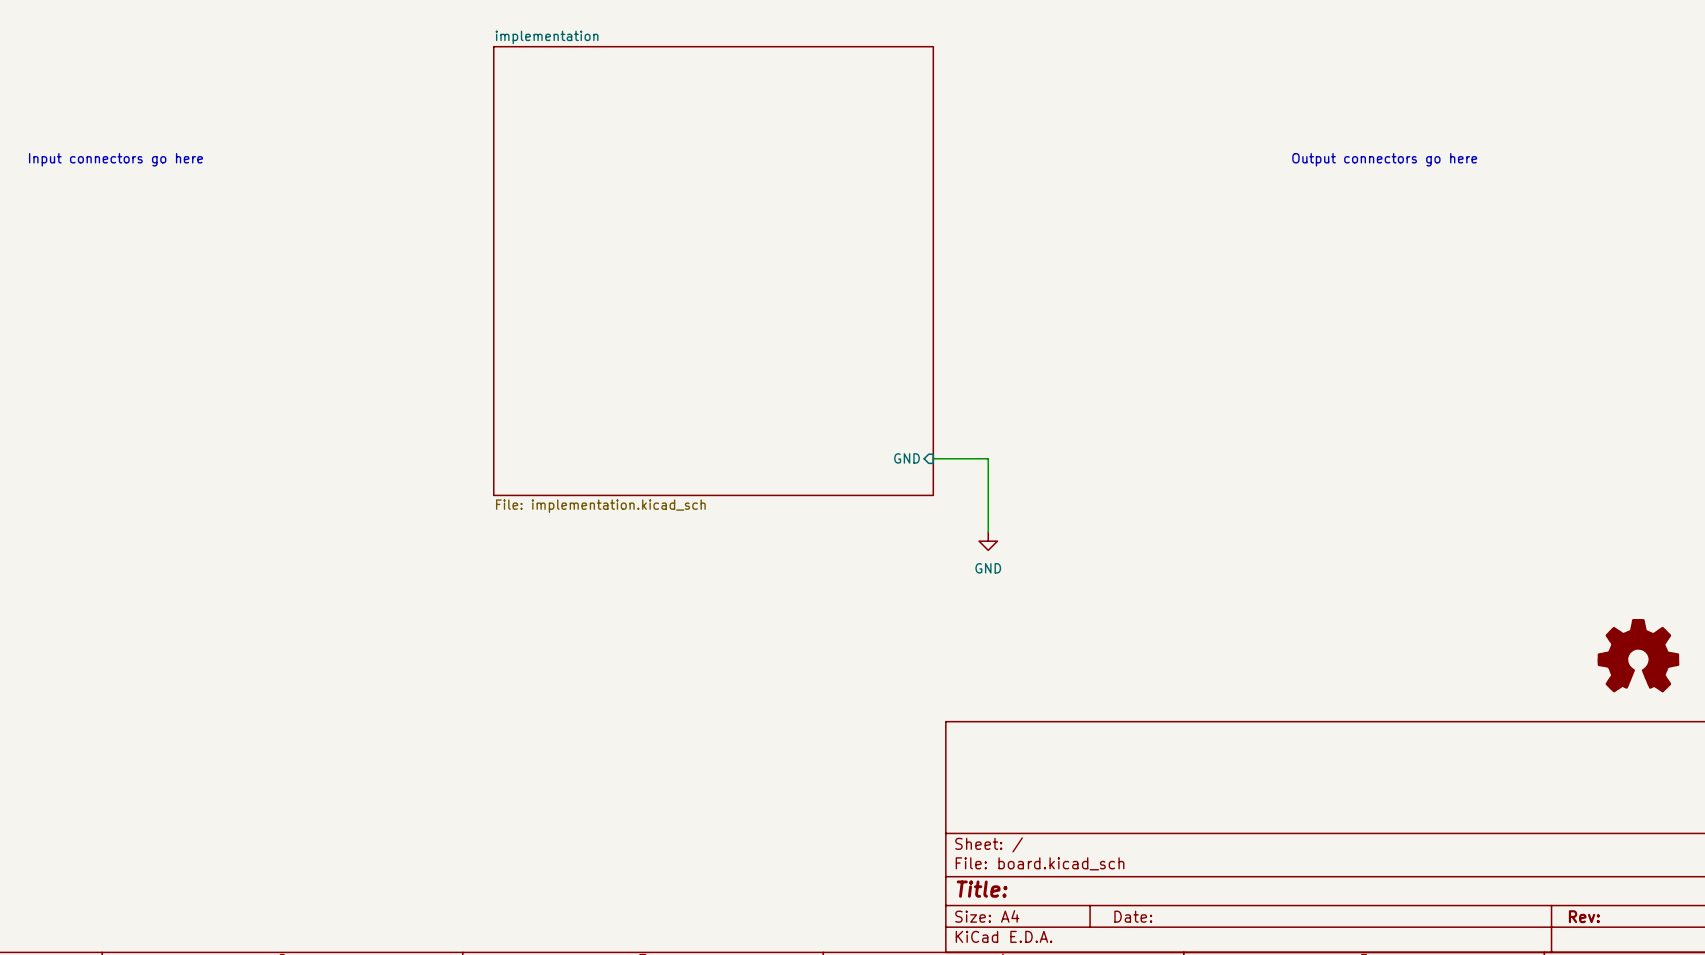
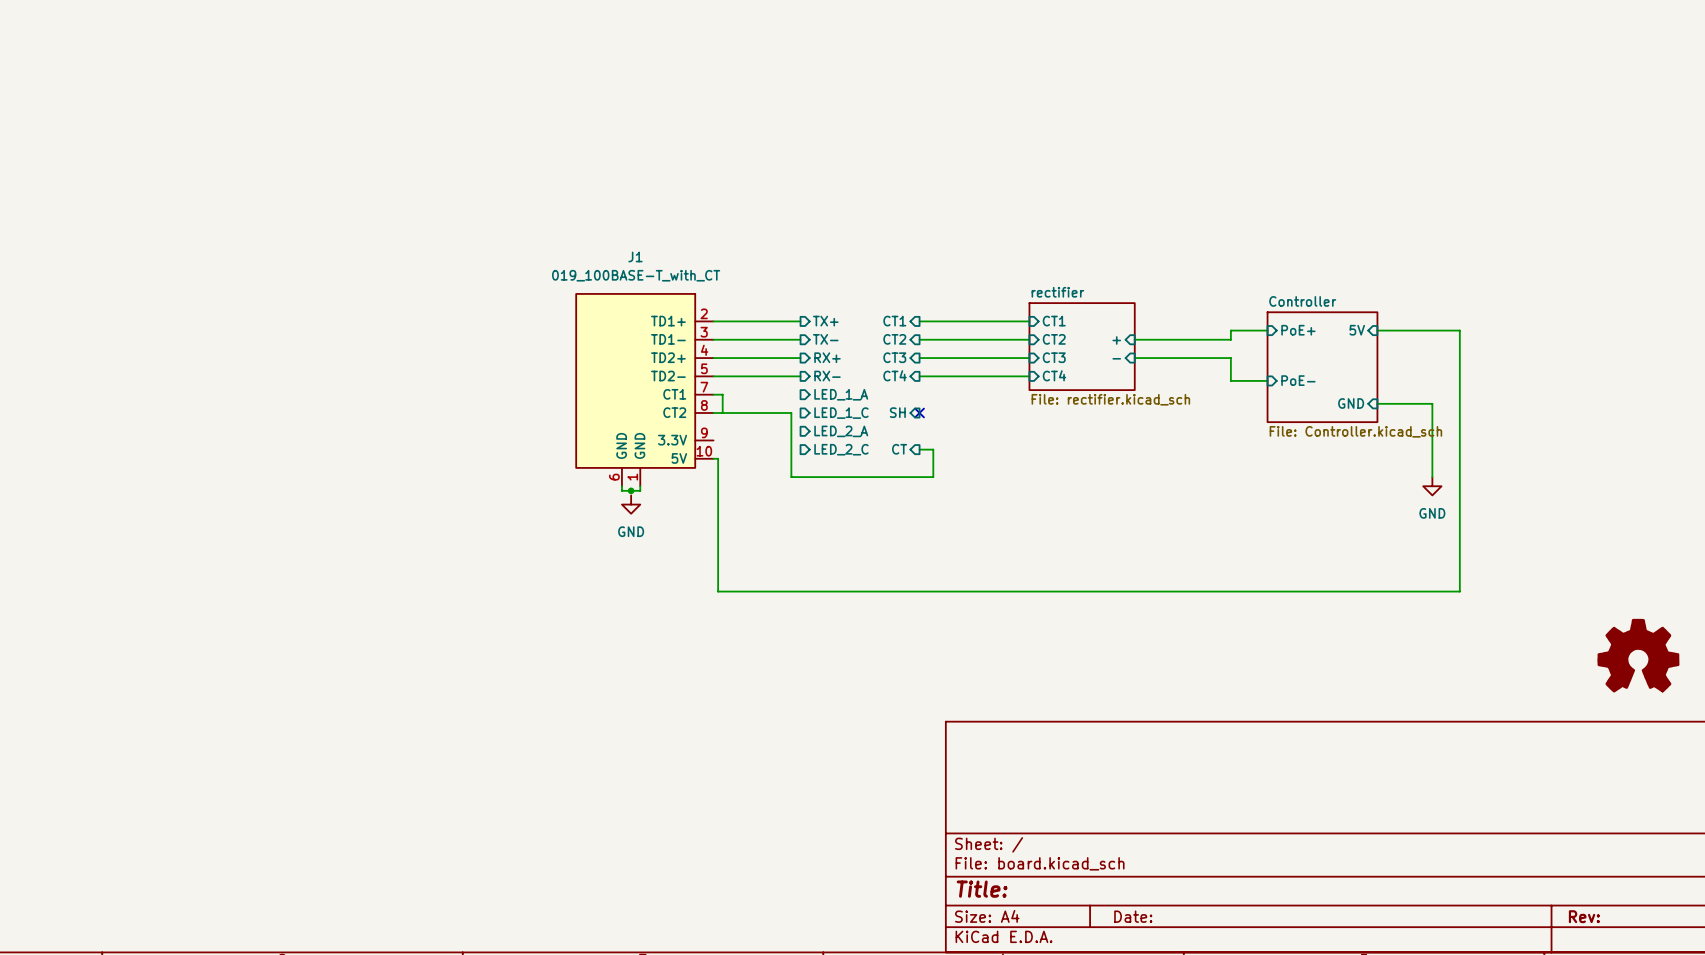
text: Input connectors go here (115, 159) -> none
text: Output connectors go here (1384, 159) -> none
sheet implementation: File: implementation.kicad_sch (713, 271) -> none
wire: none -> (713, 321) (800, 321)
sheet pin: none -> TX+ (825, 321)
sheet pin: none -> CT1 (894, 321)
wire: none -> (919, 321) (1029, 321)
sheet pin: none -> CT1 (1054, 321)
wire: none -> (1267, 330) (1230, 330) (1230, 339) (1134, 339)
sheet pin: none -> PoE+ (1298, 330)
sheet pin: none -> 5V (1357, 330)
wire: none -> (1377, 330) (1459, 330) (1459, 591) (718, 591) (718, 458) (713, 458)
wire: none -> (713, 339) (800, 339)
sheet pin: none -> TX- (825, 339)
sheet pin: none -> CT2 (894, 339)
wire: none -> (919, 339) (1029, 339)
sheet pin: none -> CT2 (1054, 339)
sheet pin: none -> + (1116, 340)
sheet rectifier: none -> File: rectifier.kicad_sch (1082, 346)
sheet pin: none -> RX+ (827, 357)
sheet pin: none -> CT3 (894, 357)
sheet pin: none -> CT3 (1054, 357)
wire: none -> (713, 358) (800, 358)
wire: none -> (919, 358) (1029, 358)
sheet pin: none -> - (1116, 358)
wire: none -> (1134, 358) (1230, 358) (1230, 380) (1267, 380)
sheet Controller: none -> File: Controller.kicad_sch (1322, 367)
sheet pin: none -> CT4 (895, 375)
sheet pin: none -> CT4 (1054, 375)
wire: none -> (713, 376) (800, 376)
sheet pin: none -> RX- (827, 376)
wire: none -> (919, 376) (1029, 376)
sheet pin: none -> PoE- (1298, 380)
J1: none -> 019_100BASE-T_with_CT (644, 390)
wire: none -> (713, 394) (722, 394) (722, 412)
sheet pin: none -> LED_1_A (841, 394)
sheet pin: none -> GND (1351, 403)
wire: none -> (1377, 403) (1432, 403) (1432, 477)
wire: none -> (713, 412) (791, 412) (791, 477) (933, 477) (933, 449) (919, 449)
sheet pin: none -> SH (897, 412)
no-connect mark: none -> (919, 412)
sheet pin: none -> LED_1_C (841, 413)
sheet pin: none -> LED_2_A (841, 431)
sheet pin: none -> LED_2_C (841, 449)
sheet pin: none -> CT (899, 449)
sheet pin: GND (907, 458) -> none
wire: (933, 458) (988, 458) (988, 532) -> none
wire: none -> (621, 486) (621, 490) (640, 490) (640, 486)
power symbol: none -> GND (1432, 486)
junction: none -> (631, 490)
power symbol: none -> GND (631, 504)
power symbol: GND (988, 541) -> none

